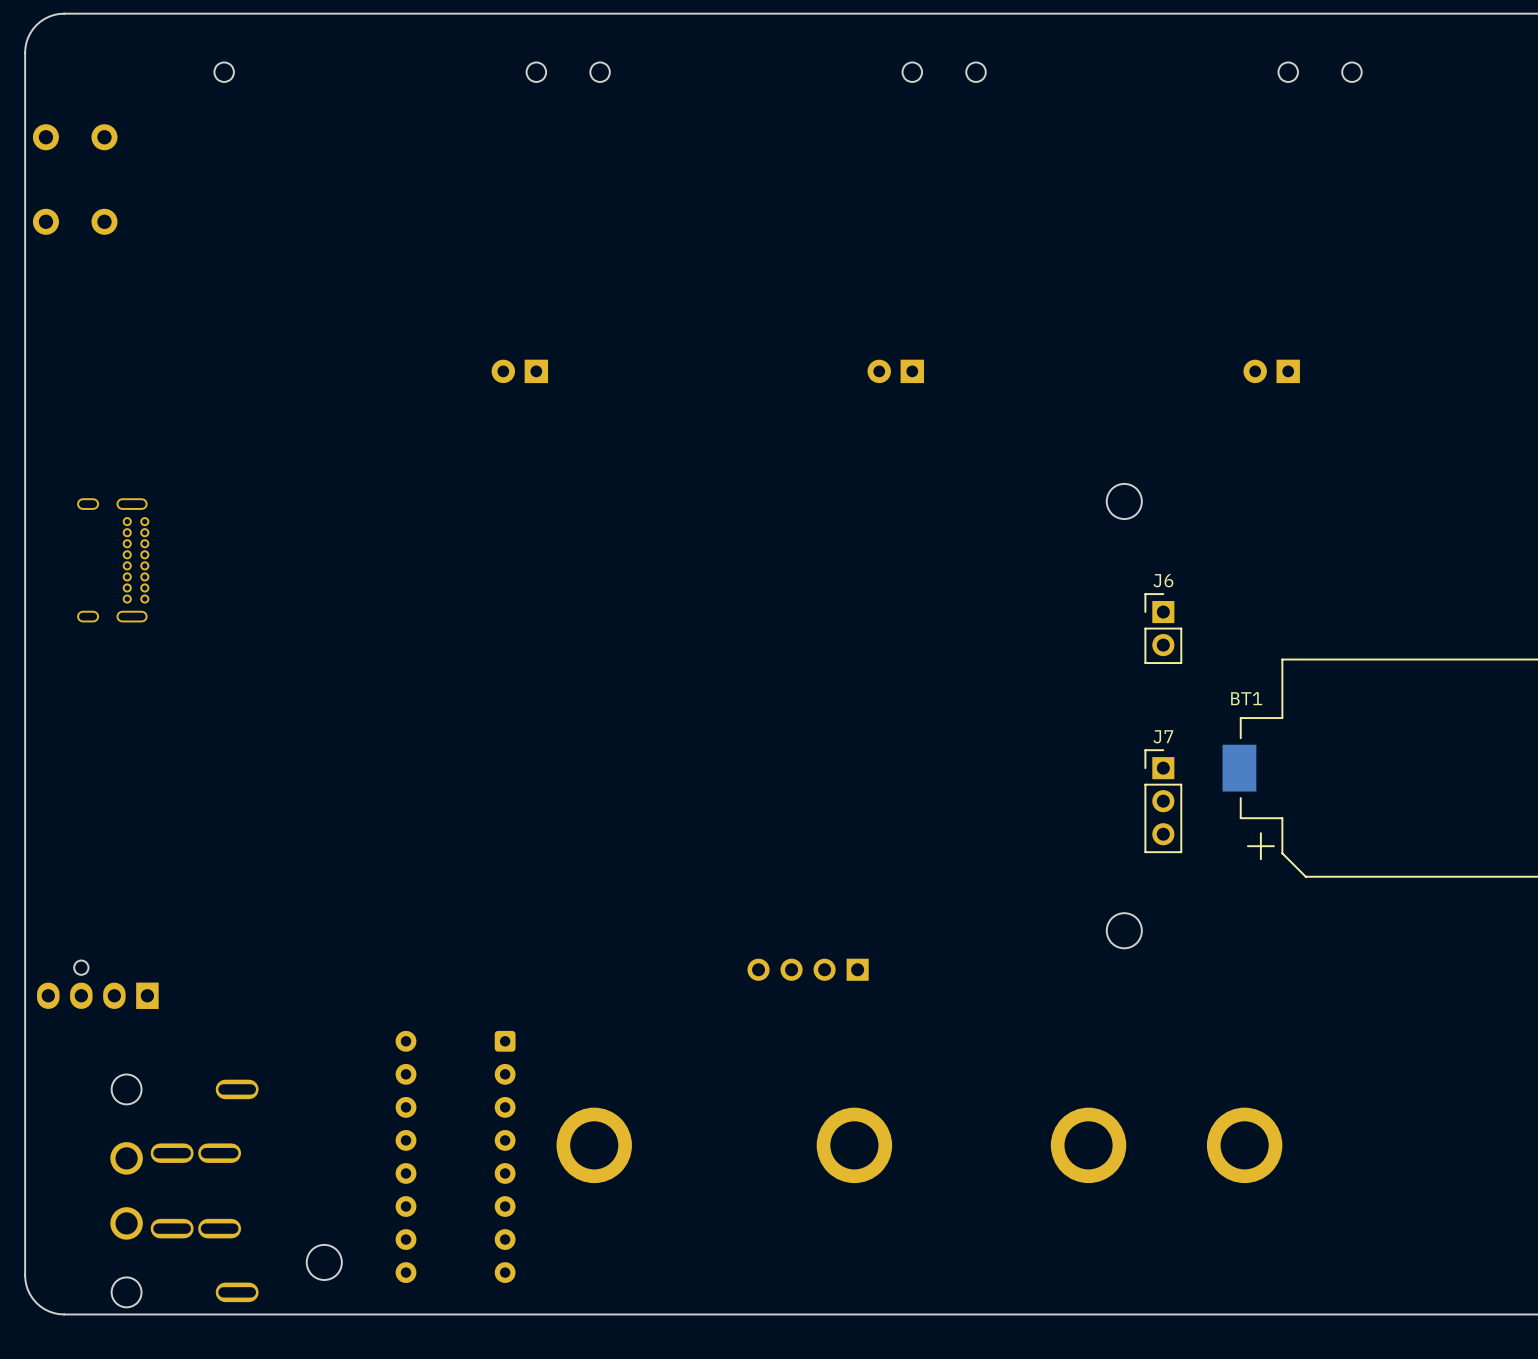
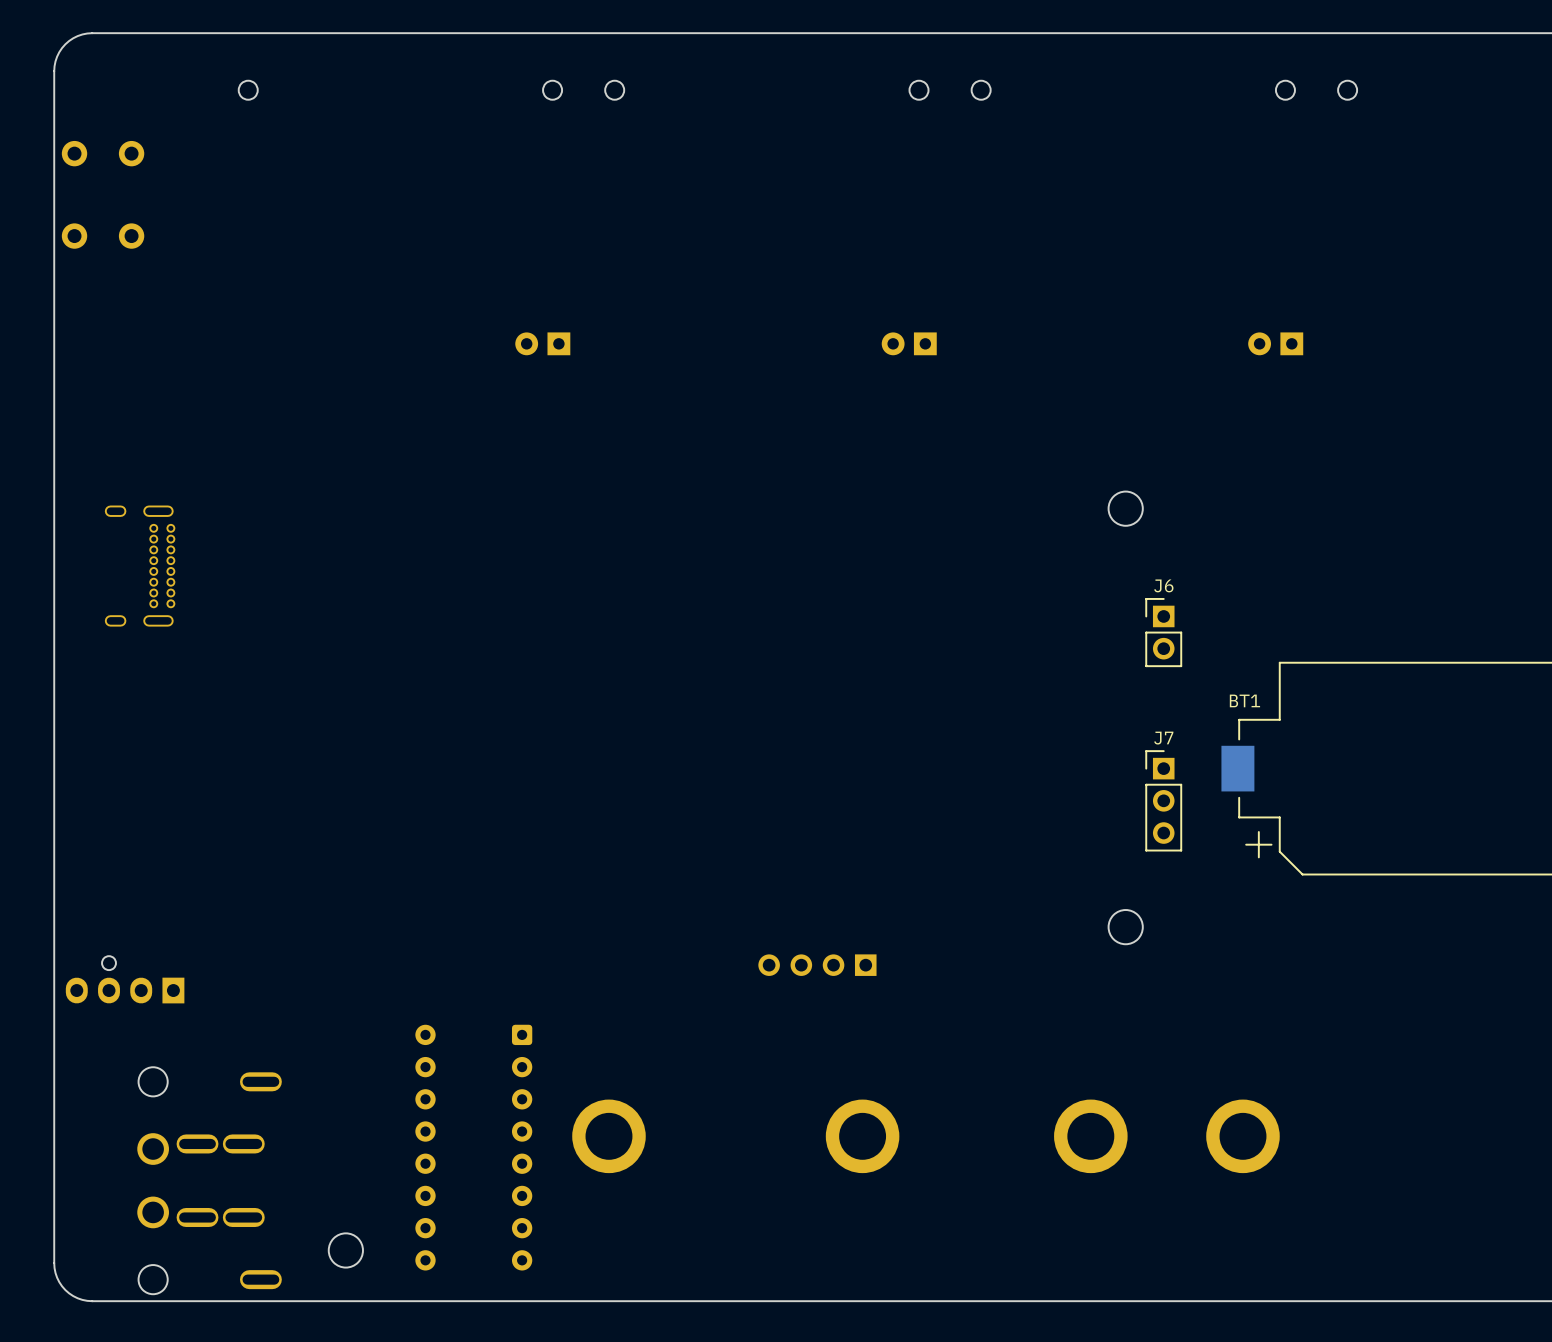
part position: (519, 371) -> (542, 343)
part position: (895, 371) -> (909, 343)
part position: (1271, 371) -> (1275, 343)

